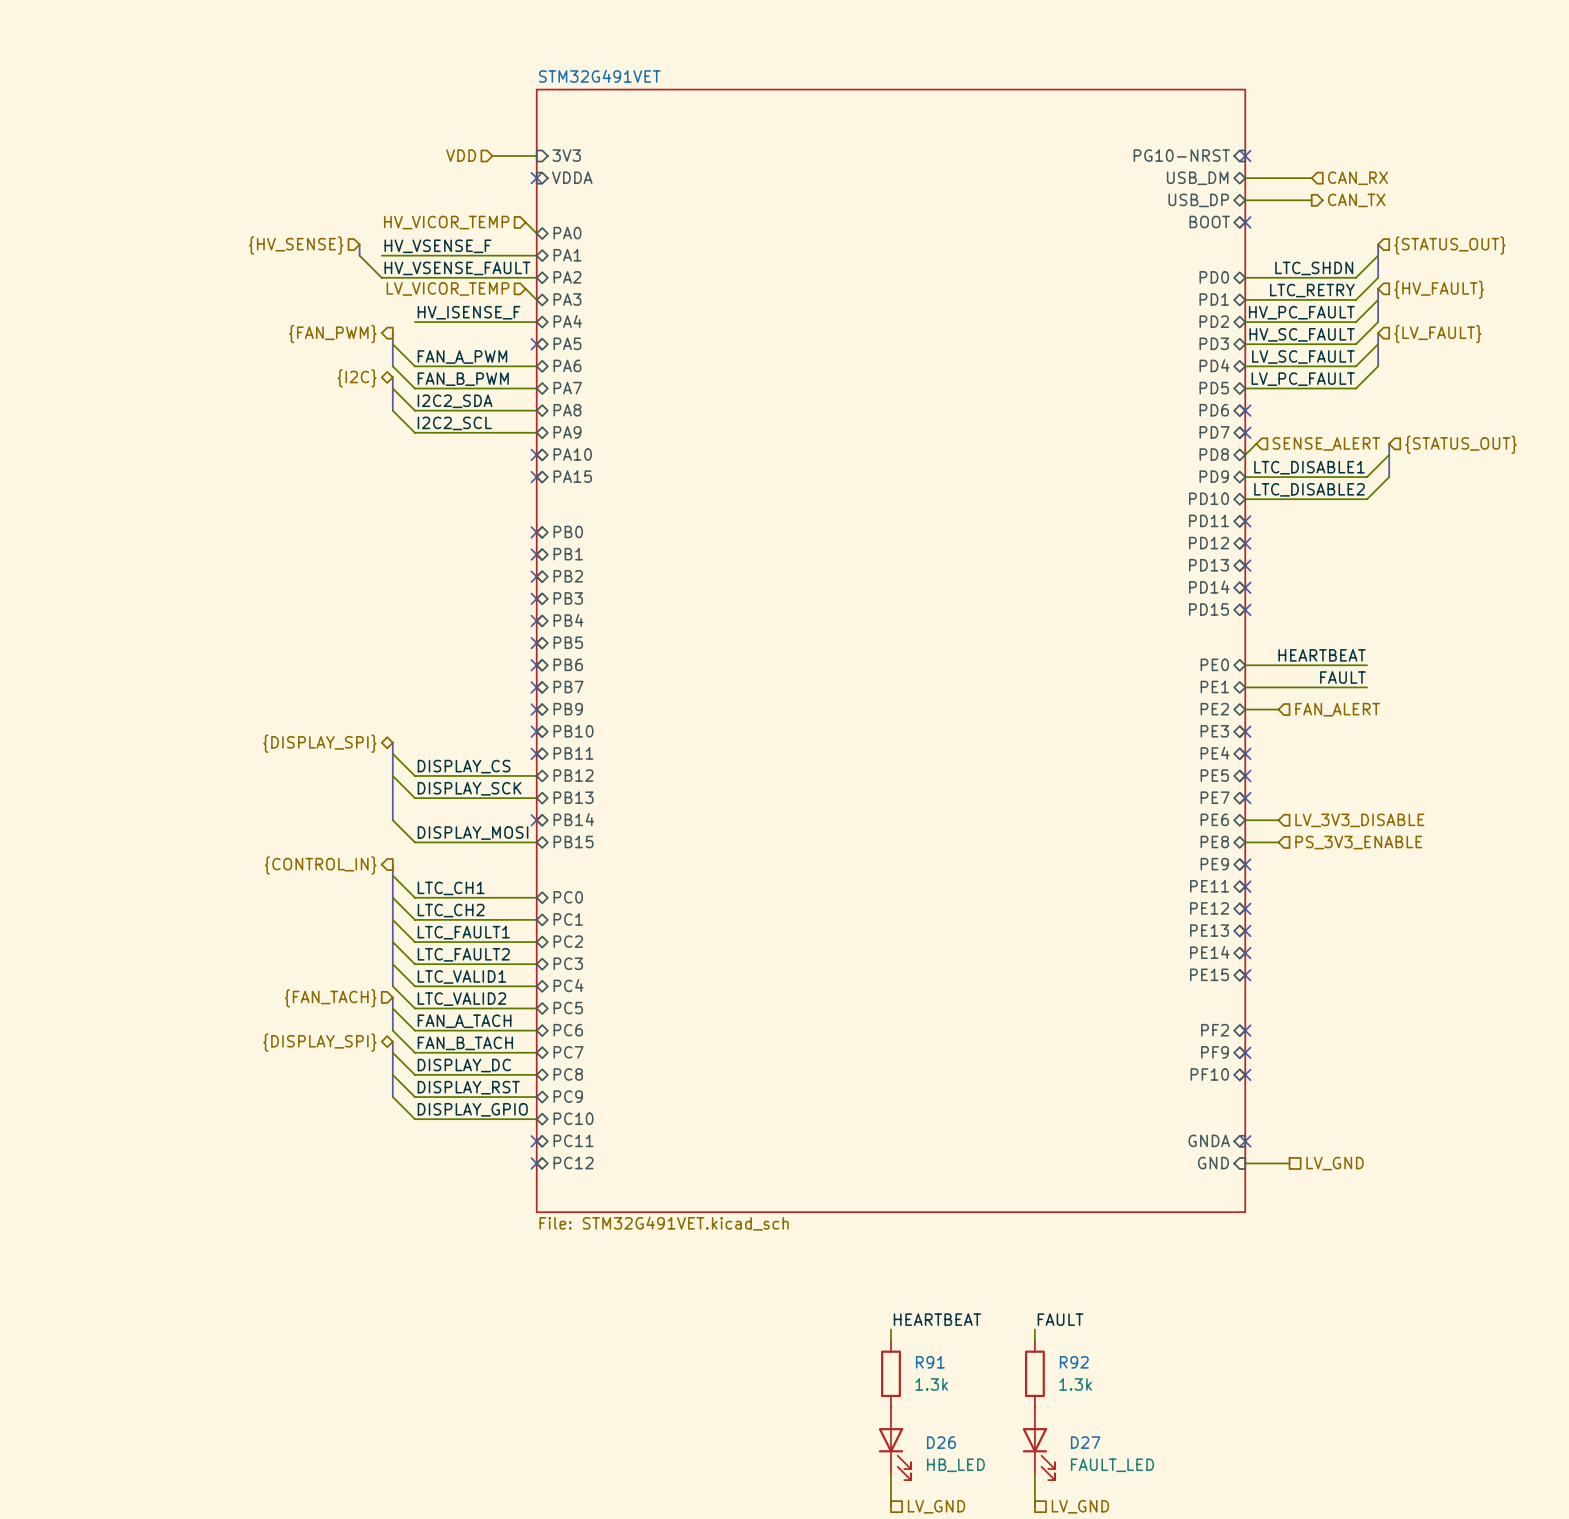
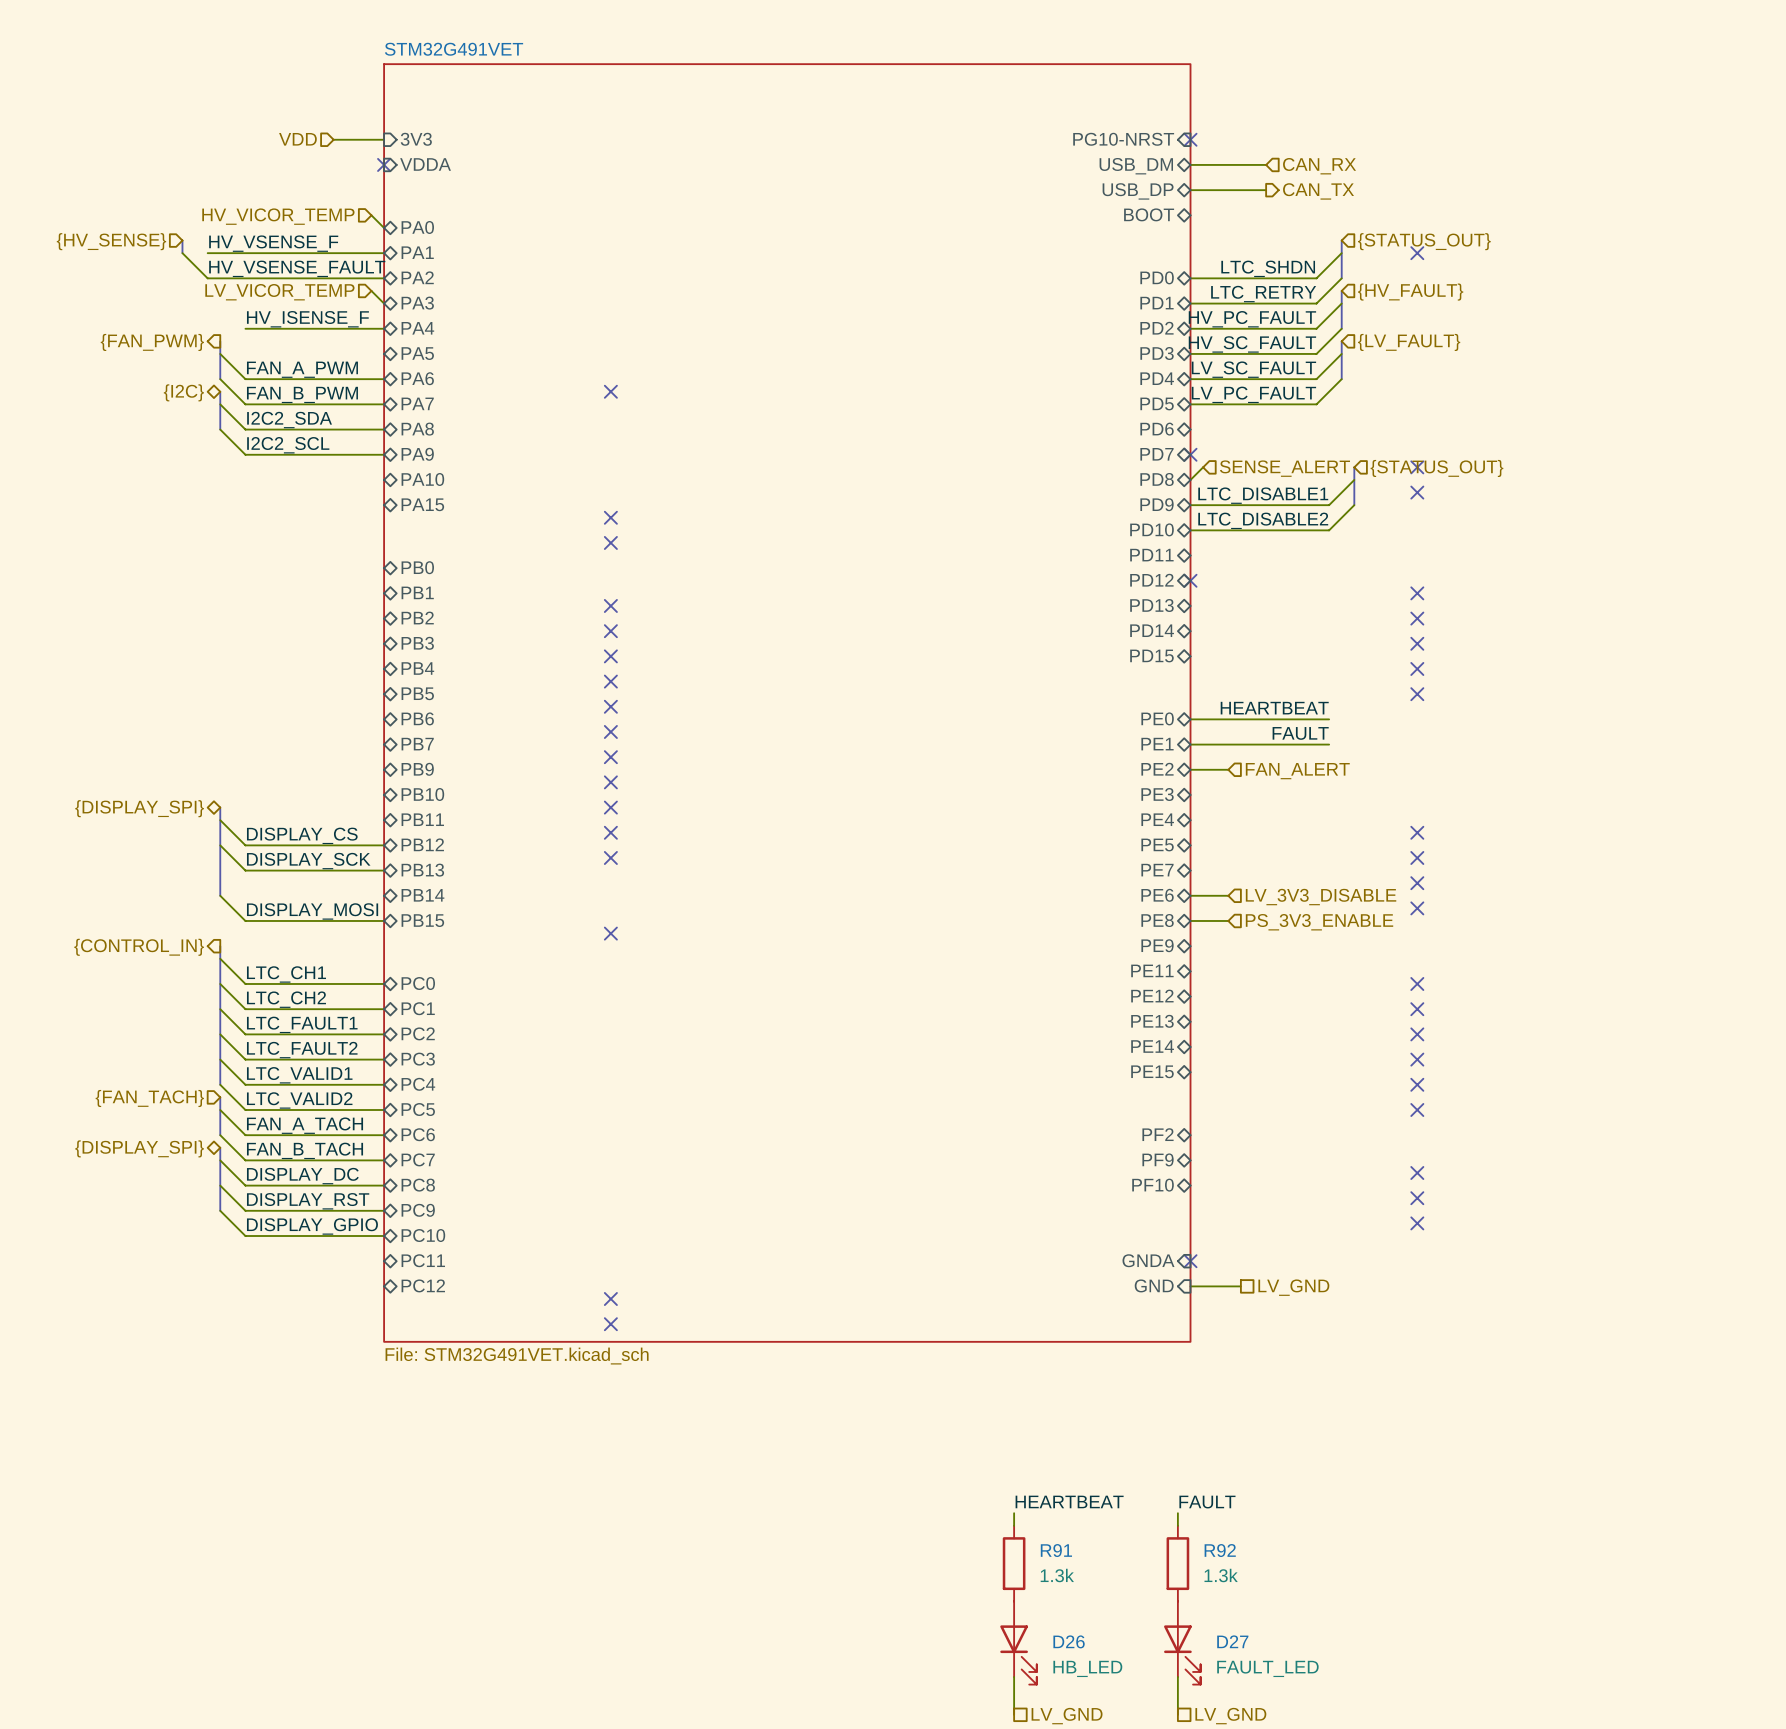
no-connect mark: none -> (1190, 139)
no-connect mark: none -> (384, 164)
hierarchical label position: VDD (461, 155) -> VDD (297, 139)
sheet pin position: 3V3 (566, 155) -> 3V3 (416, 139)
sheet pin position: PG10-NRST (1181, 155) -> PG10-NRST (1123, 139)
wire: (492, 156) (536, 156) -> (333, 139) (384, 139)
no-connect mark: (1245, 156) -> none
sheet pin position: VDDA (572, 177) -> VDDA (425, 164)
no-connect mark: (536, 178) -> none
sheet pin position: USB_DM (1197, 178) -> USB_DM (1136, 166)
wire: (1245, 178) (1311, 178) -> (1190, 164) (1266, 164)
hierarchical label position: CAN_RX (1358, 178) -> CAN_RX (1319, 166)
sheet pin position: USB_DP (1198, 200) -> USB_DP (1138, 191)
wire: (1245, 200) (1311, 200) -> (1190, 190) (1266, 190)
hierarchical label position: CAN_TX (1356, 200) -> CAN_TX (1318, 191)
hierarchical label: none -> {STATUS_OUT} (1424, 241)
hierarchical label position: HV_VICOR_TEMP (446, 222) -> HV_VICOR_TEMP (278, 216)
wire: (525, 222) (536, 233) -> (371, 215) (384, 227)
sheet pin position: BOOT (1209, 222) -> BOOT (1149, 214)
sheet pin position: PA0 (567, 233) -> PA0 (417, 227)
bus: (359, 244) (359, 255) -> (182, 240) (182, 253)
bus: (1378, 244) (1378, 277) -> (1341, 240) (1341, 278)
hierarchical label position: {HV_SENSE} (296, 245) -> {HV_SENSE} (111, 241)
hierarchical label: {STATUS_OUT} (1449, 245) -> none
label position: HV_VSENSE_F (437, 246) -> HV_VSENSE_F (273, 243)
wire: (359, 255) (381, 277) (536, 277) -> (182, 253) (207, 278) (384, 278)
wire: (381, 255) (536, 255) -> (207, 253) (384, 253)
sheet pin position: PA1 (567, 255) -> PA1 (417, 252)
wire: (1378, 255) (1355, 277) (1245, 277) -> (1341, 253) (1316, 278) (1190, 278)
label position: HV_VSENSE_FAULT (457, 268) -> HV_VSENSE_FAULT (297, 268)
label position: LTC_SHDN (1314, 268) -> LTC_SHDN (1268, 268)
sheet pin position: PA2 (567, 277) -> PA2 (417, 277)
sheet pin position: PD0 (1214, 277) -> PD0 (1157, 277)
wire: (1378, 277) (1355, 299) (1245, 299) -> (1341, 278) (1316, 303) (1190, 303)
hierarchical label position: LV_VICOR_TEMP (447, 288) -> LV_VICOR_TEMP (279, 292)
wire: (525, 288) (536, 299) -> (371, 290) (384, 303)
bus: (1378, 288) (1378, 322) -> (1341, 290) (1341, 328)
hierarchical label position: {HV_FAULT} (1439, 289) -> {HV_FAULT} (1410, 292)
label position: LTC_RETRY (1312, 290) -> LTC_RETRY (1263, 294)
sheet pin position: PA3 (567, 299) -> PA3 (417, 303)
sheet pin position: PD1 (1214, 299) -> PD1 (1156, 303)
wire: (1378, 299) (1355, 322) (1245, 322) -> (1341, 303) (1316, 328) (1190, 328)
label position: HV_ISENSE_F (469, 312) -> HV_ISENSE_F (307, 319)
label position: HV_PC_FAULT (1301, 312) -> HV_PC_FAULT (1252, 319)
sheet pin position: PA4 (567, 321) -> PA4 (417, 328)
sheet pin position: PD2 (1214, 321) -> PD2 (1156, 328)
wire: (414, 322) (536, 322) -> (245, 328) (384, 328)
wire: (1378, 322) (1355, 344) (1245, 344) -> (1341, 328) (1316, 353) (1190, 353)
bus: (392, 333) (392, 366) -> (220, 341) (220, 379)
bus: (1378, 333) (1378, 366) -> (1341, 341) (1341, 379)
hierarchical label position: {FAN_PWM} (332, 334) -> {FAN_PWM} (152, 342)
label position: HV_SC_FAULT (1302, 334) -> HV_SC_FAULT (1252, 344)
hierarchical label position: {LV_FAULT} (1437, 334) -> {LV_FAULT} (1409, 342)
sheet pin position: PA5 (567, 343) -> PA5 (417, 353)
sheet pin position: PD3 (1214, 343) -> PD3 (1157, 353)
wire: (392, 344) (414, 366) (536, 366) -> (220, 353) (245, 379) (384, 379)
wire: (1378, 344) (1355, 366) (1245, 366) -> (1341, 353) (1316, 379) (1190, 379)
label position: FAN_A_PWM (462, 357) -> FAN_A_PWM (302, 369)
label position: LV_SC_FAULT (1303, 357) -> LV_SC_FAULT (1253, 369)
sheet pin position: PA6 (567, 365) -> PA6 (417, 378)
sheet pin position: PD4 (1214, 365) -> PD4 (1157, 378)
wire: (392, 366) (414, 388) (536, 388) -> (220, 379) (245, 404) (384, 404)
wire: (1378, 366) (1355, 388) (1245, 388) -> (1341, 379) (1316, 404) (1190, 404)
bus: (392, 377) (392, 410) -> (220, 391) (220, 429)
hierarchical label position: {I2C} (357, 378) -> {I2C} (183, 392)
label position: FAN_B_PWM (463, 379) -> FAN_B_PWM (302, 394)
label position: LV_PC_FAULT (1303, 379) -> LV_PC_FAULT (1253, 394)
wire: (392, 388) (414, 410) (536, 410) -> (220, 404) (245, 429) (384, 429)
sheet pin position: PA7 (567, 388) -> PA7 (417, 403)
sheet pin position: PD5 (1214, 388) -> PD5 (1157, 403)
no-connect mark: none -> (1190, 454)
label position: I2C2_SDA (455, 401) -> I2C2_SDA (289, 420)
wire: (392, 410) (414, 432) (536, 432) -> (220, 429) (245, 454) (384, 454)
sheet pin position: PA8 (567, 410) -> PA8 (417, 429)
sheet pin position: PD6 (1214, 410) -> PD6 (1157, 429)
hierarchical label: none -> {STATUS_OUT} (1436, 468)
label position: I2C2_SCL (454, 423) -> I2C2_SCL (288, 445)
sheet pin position: PA9 (567, 432) -> PA9 (417, 454)
sheet pin position: PD7 (1214, 432) -> PD7 (1156, 454)
wire: (1256, 443) (1245, 454) -> (1203, 467) (1190, 479)
hierarchical label position: SENSE_ALERT (1326, 443) -> SENSE_ALERT (1284, 468)
bus: (1389, 443) (1389, 477) -> (1354, 467) (1354, 505)
hierarchical label: {STATUS_OUT} (1461, 444) -> none
sheet pin position: PA10 (572, 454) -> PA10 (422, 479)
sheet pin position: PD8 (1214, 454) -> PD8 (1157, 479)
wire: (1389, 454) (1367, 477) (1245, 477) -> (1354, 479) (1329, 505) (1190, 505)
label position: LTC_DISABLE1 (1309, 467) -> LTC_DISABLE1 (1263, 495)
sheet pin position: PA15 (572, 476) -> PA15 (422, 504)
sheet pin position: PD9 (1214, 476) -> PD9 (1157, 504)
wire: (1389, 477) (1367, 499) (1245, 499) -> (1354, 505) (1329, 530) (1190, 530)
label position: LTC_DISABLE2 (1309, 489) -> LTC_DISABLE2 (1263, 520)
sheet pin position: PD10 (1208, 498) -> PD10 (1151, 529)
no-connect mark: none -> (1190, 580)
sheet pin position: PD11 (1208, 520) -> PD11 (1151, 555)
sheet pin position: PB0 (568, 532) -> PB0 (417, 567)
sheet pin position: PD12 (1208, 543) -> PD12 (1151, 580)
sheet pin position: PB1 (568, 554) -> PB1 (417, 592)
sheet pin position: PD13 (1208, 565) -> PD13 (1151, 605)
sheet pin position: PB2 (568, 576) -> PB2 (417, 618)
sheet pin position: PD14 (1209, 587) -> PD14 (1152, 630)
sheet pin position: PB3 (568, 598) -> PB3 (417, 643)
sheet pin position: PD15 (1208, 609) -> PD15 (1151, 655)
sheet pin position: PB4 (568, 620) -> PB4 (417, 668)
sheet pin position: PB5 (568, 642) -> PB5 (417, 693)
sheet STM32G491VET position: (891, 650) -> (787, 703)
label position: HEARTBEAT (1322, 655) -> HEARTBEAT (1274, 708)
sheet pin position: PB6 (568, 664) -> PB6 (417, 718)
sheet pin position: PE0 (1214, 664) -> PE0 (1157, 718)
wire: (1245, 665) (1367, 665) -> (1190, 719) (1329, 719)
label position: FAULT (1342, 677) -> FAULT (1300, 733)
sheet pin position: PB7 (568, 686) -> PB7 (417, 744)
sheet pin position: PE1 (1214, 686) -> PE1 (1157, 744)
wire: (1245, 687) (1367, 687) -> (1190, 744) (1329, 744)
sheet pin position: PB9 (568, 709) -> PB9 (417, 769)
sheet pin position: PE2 (1214, 709) -> PE2 (1157, 769)
wire: (1245, 709) (1278, 709) -> (1190, 769) (1228, 769)
hierarchical label position: FAN_ALERT (1337, 709) -> FAN_ALERT (1297, 771)
hierarchical label: none -> {DISPLAY_SPI} (139, 808)
sheet pin position: PB10 (573, 731) -> PB10 (422, 794)
sheet pin position: PE3 (1214, 731) -> PE3 (1157, 794)
bus: (392, 742) (392, 820) -> (220, 807) (220, 895)
hierarchical label: {DISPLAY_SPI} (319, 743) -> none
wire: (392, 753) (414, 775) (536, 775) -> (220, 820) (245, 845) (384, 845)
sheet pin position: PB11 (573, 753) -> PB11 (422, 819)
sheet pin position: PE4 (1215, 753) -> PE4 (1157, 819)
label position: DISPLAY_CS (464, 766) -> DISPLAY_CS (302, 835)
wire: (392, 775) (414, 798) (536, 798) -> (220, 845) (245, 870) (384, 870)
sheet pin position: PB12 (573, 775) -> PB12 (422, 844)
sheet pin position: PE5 (1214, 775) -> PE5 (1157, 845)
label position: DISPLAY_SCK (469, 788) -> DISPLAY_SCK (308, 861)
sheet pin position: PB13 (573, 797) -> PB13 (422, 870)
sheet pin position: PE7 (1215, 797) -> PE7 (1157, 870)
sheet pin position: PB14 (573, 819) -> PB14 (422, 895)
sheet pin position: PE6 (1214, 819) -> PE6 (1157, 895)
wire: (392, 820) (414, 842) (536, 842) -> (220, 895) (245, 920) (384, 920)
wire: (1245, 820) (1278, 820) -> (1190, 895) (1228, 895)
hierarchical label position: LV_3V3_DISABLE (1359, 820) -> LV_3V3_DISABLE (1321, 897)
label position: DISPLAY_MOSI (473, 833) -> DISPLAY_MOSI (312, 911)
sheet pin position: PB15 (573, 841) -> PB15 (422, 920)
sheet pin position: PE8 (1214, 841) -> PE8 (1157, 920)
wire: (1245, 842) (1278, 842) -> (1190, 920) (1228, 920)
hierarchical label position: PS_3V3_ENABLE (1358, 842) -> PS_3V3_ENABLE (1319, 922)
bus: (392, 864) (392, 986) -> (220, 946) (220, 1084)
sheet pin position: PE9 (1214, 864) -> PE9 (1157, 945)
hierarchical label position: {CONTROL_IN} (320, 865) -> {CONTROL_IN} (139, 947)
wire: (392, 875) (414, 897) (536, 897) -> (220, 958) (245, 983) (384, 983)
sheet pin position: PE11 (1209, 886) -> PE11 (1152, 970)
label position: LTC_CH1 (451, 888) -> LTC_CH1 (286, 974)
wire: (392, 897) (414, 919) (536, 919) -> (220, 983) (245, 1009) (384, 1009)
sheet pin position: PC0 (568, 897) -> PC0 (418, 983)
sheet pin position: PE12 (1209, 908) -> PE12 (1152, 996)
label position: LTC_CH2 (451, 910) -> LTC_CH2 (286, 999)
wire: (392, 919) (414, 942) (536, 942) -> (220, 1009) (245, 1034) (384, 1034)
sheet pin position: PC1 (568, 919) -> PC1 (418, 1008)
sheet pin position: PE13 (1209, 930) -> PE13 (1152, 1021)
label position: LTC_FAULT1 (463, 932) -> LTC_FAULT1 (302, 1024)
sheet pin position: PC2 (568, 941) -> PC2 (418, 1033)
wire: (392, 942) (414, 964) (536, 964) -> (220, 1034) (245, 1059) (384, 1059)
sheet pin position: PE14 (1209, 952) -> PE14 (1152, 1046)
label position: LTC_FAULT2 (463, 954) -> LTC_FAULT2 (302, 1050)
sheet pin position: PC3 (568, 963) -> PC3 (418, 1059)
wire: (392, 964) (414, 986) (536, 986) -> (220, 1059) (245, 1084) (384, 1084)
sheet pin position: PE15 (1209, 974) -> PE15 (1152, 1071)
label position: LTC_VALID1 (461, 976) -> LTC_VALID1 (299, 1075)
sheet pin position: PC4 (568, 985) -> PC4 (418, 1084)
wire: (392, 986) (414, 1008) (536, 1008) -> (220, 1084) (245, 1109) (384, 1109)
bus: (392, 997) (392, 1030) -> (220, 1097) (220, 1135)
hierarchical label position: {FAN_TACH} (330, 998) -> {FAN_TACH} (149, 1098)
label position: LTC_VALID2 (461, 999) -> LTC_VALID2 (299, 1100)
wire: (392, 1008) (414, 1030) (536, 1030) -> (220, 1109) (245, 1135) (384, 1135)
sheet pin position: PC5 (568, 1008) -> PC5 (418, 1109)
hierarchical label: none -> {DISPLAY_SPI} (139, 1148)
label position: FAN_A_TACH (464, 1021) -> FAN_A_TACH (305, 1125)
wire: (392, 1030) (414, 1052) (536, 1052) -> (220, 1135) (245, 1160) (384, 1160)
sheet pin position: PC6 (568, 1030) -> PC6 (418, 1134)
sheet pin position: PF2 (1215, 1030) -> PF2 (1158, 1134)
bus: (392, 1041) (392, 1097) -> (220, 1147) (220, 1210)
hierarchical label: {DISPLAY_SPI} (319, 1042) -> none
label position: FAN_B_TACH (465, 1043) -> FAN_B_TACH (305, 1150)
wire: (392, 1052) (414, 1074) (536, 1074) -> (220, 1160) (245, 1185) (384, 1185)
sheet pin position: PC7 (568, 1052) -> PC7 (418, 1159)
sheet pin position: PF9 (1215, 1052) -> PF9 (1158, 1159)
label position: DISPLAY_DC (464, 1065) -> DISPLAY_DC (302, 1176)
wire: (392, 1074) (414, 1097) (536, 1097) -> (220, 1185) (245, 1210) (384, 1210)
sheet pin position: PC8 (568, 1074) -> PC8 (418, 1185)
sheet pin position: PF10 (1209, 1074) -> PF10 (1153, 1185)
label position: DISPLAY_RST (468, 1087) -> DISPLAY_RST (308, 1201)
sheet pin position: PC9 (568, 1096) -> PC9 (418, 1210)
wire: (392, 1097) (414, 1119) (536, 1119) -> (220, 1210) (245, 1236) (384, 1236)
no-connect mark: none -> (1190, 1261)
label position: DISPLAY_GPIO (472, 1109) -> DISPLAY_GPIO (312, 1226)
sheet pin position: PC10 (573, 1118) -> PC10 (423, 1235)
sheet pin position: PC11 (573, 1140) -> PC11 (423, 1260)
sheet pin position: GNDA (1209, 1140) -> GNDA (1148, 1260)
no-connect mark: (1245, 1141) -> none
sheet pin position: PC12 (573, 1163) -> PC12 (423, 1285)
sheet pin position: GND (1213, 1163) -> GND (1154, 1285)
wire: (1245, 1163) (1289, 1163) -> (1190, 1286) (1240, 1286)
hierarchical label position: LV_GND (1335, 1163) -> LV_GND (1293, 1287)

